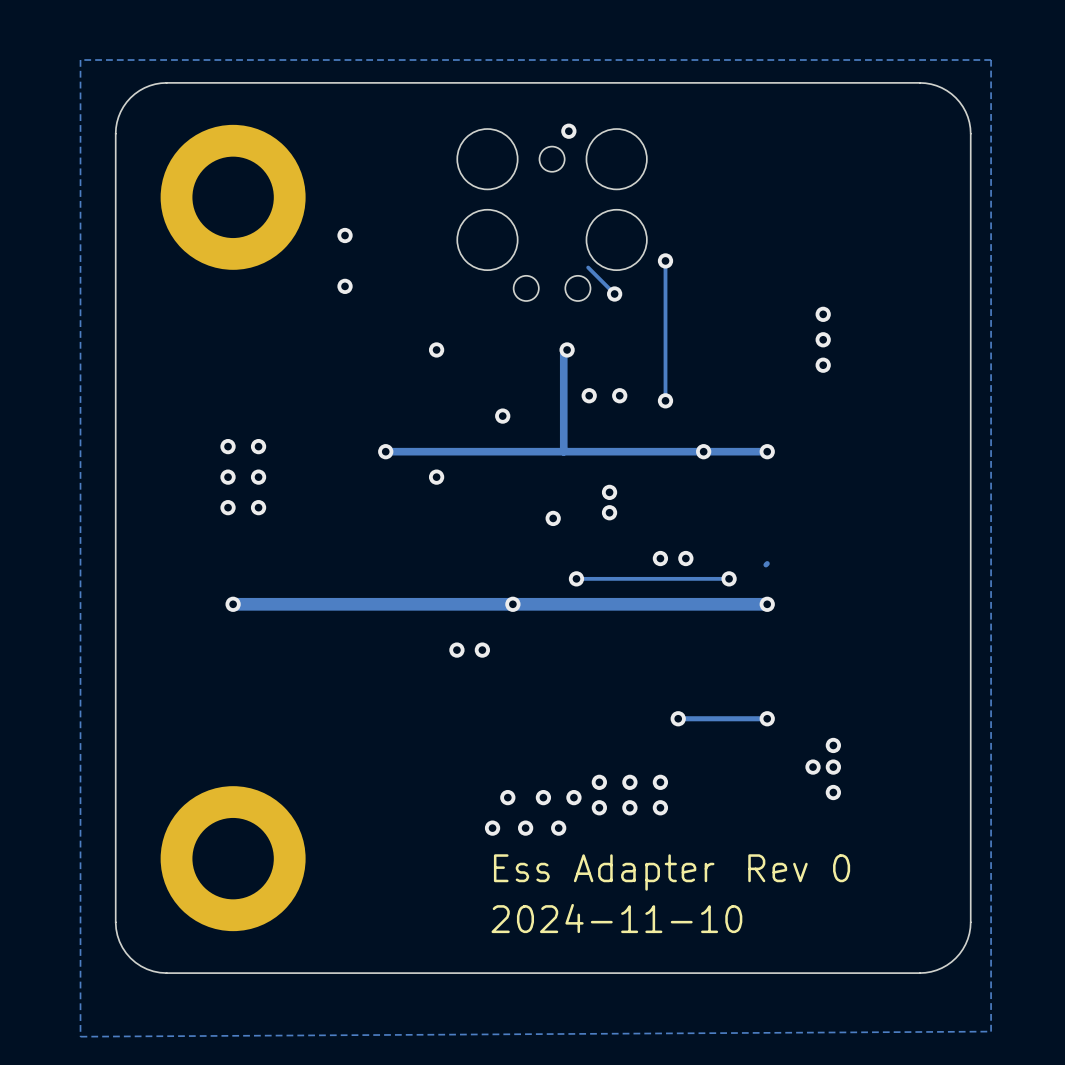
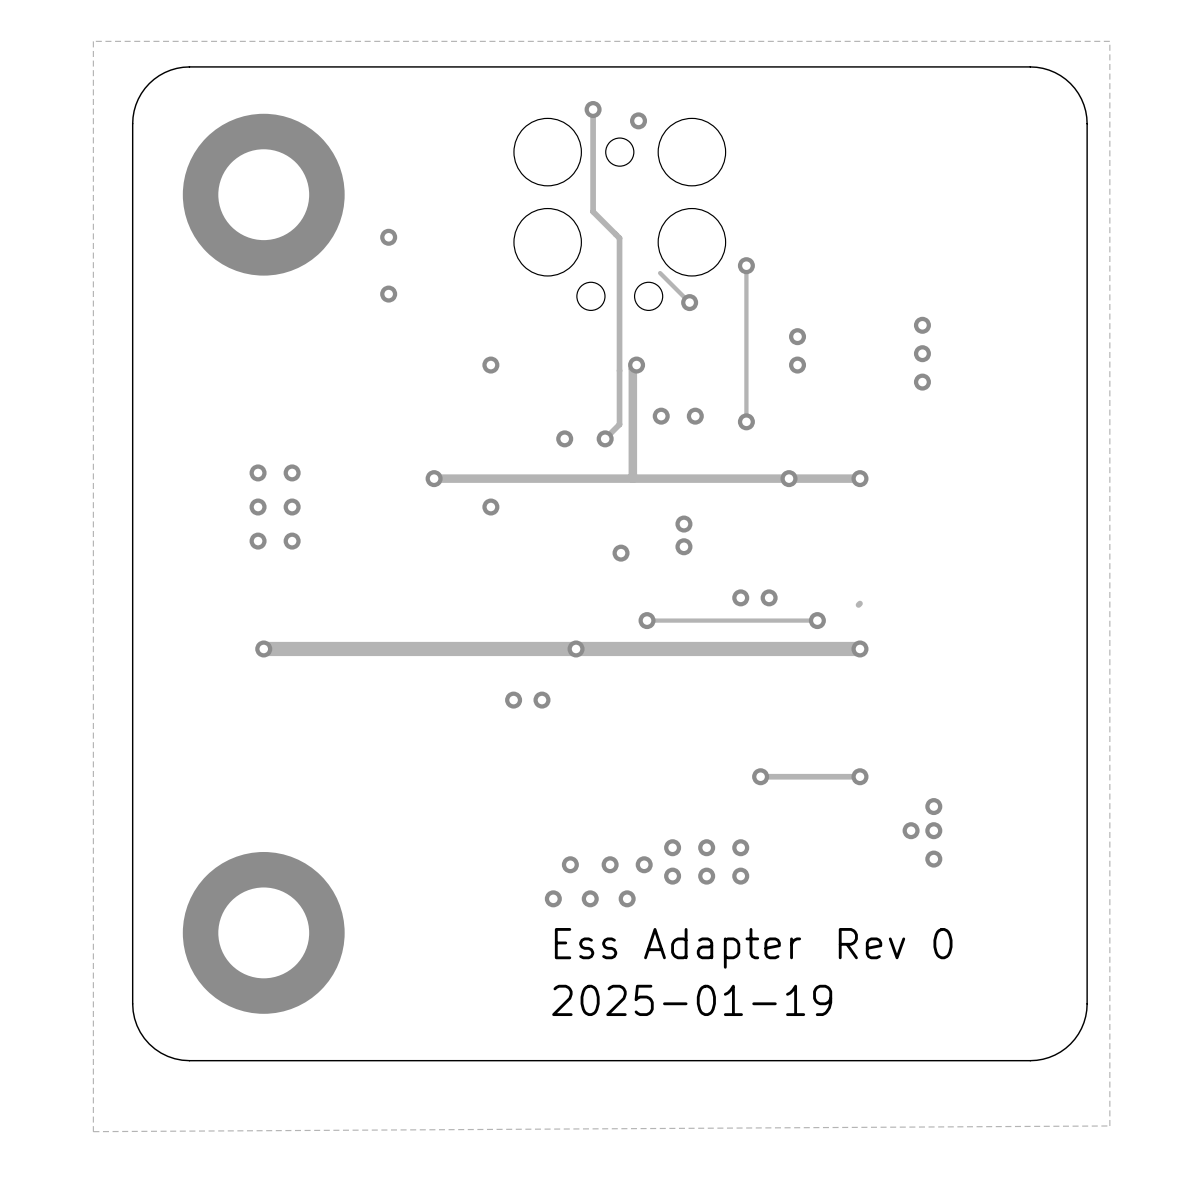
track: none -> (593, 109) (593, 211) (619, 238) (619, 424) (605, 438)
via: none -> (593, 109)
via: none -> (797, 336)
via: none -> (797, 365)
via: none -> (605, 438)
text: 2024-11-10 (616, 918) -> 2025-01-19 (692, 1000)

